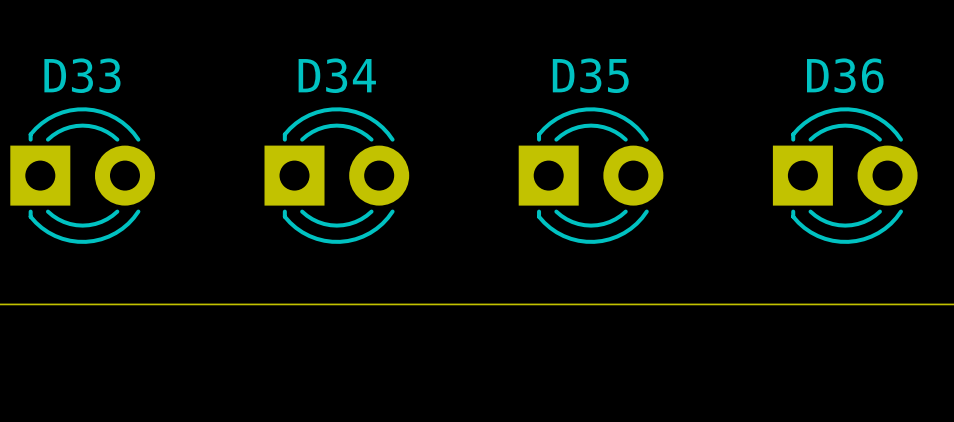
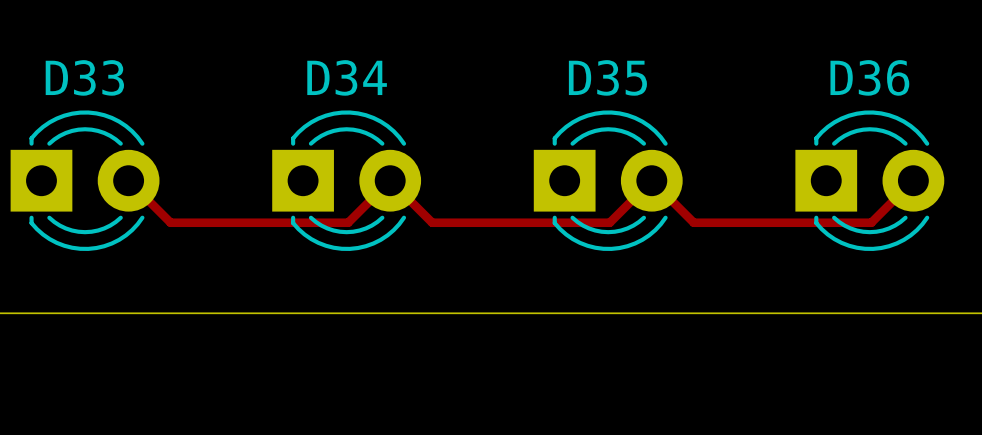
track: none -> (128, 180) (170, 222) (348, 222) (390, 180) (432, 222) (609, 222) (651, 180) (693, 222) (871, 222) (913, 180)

